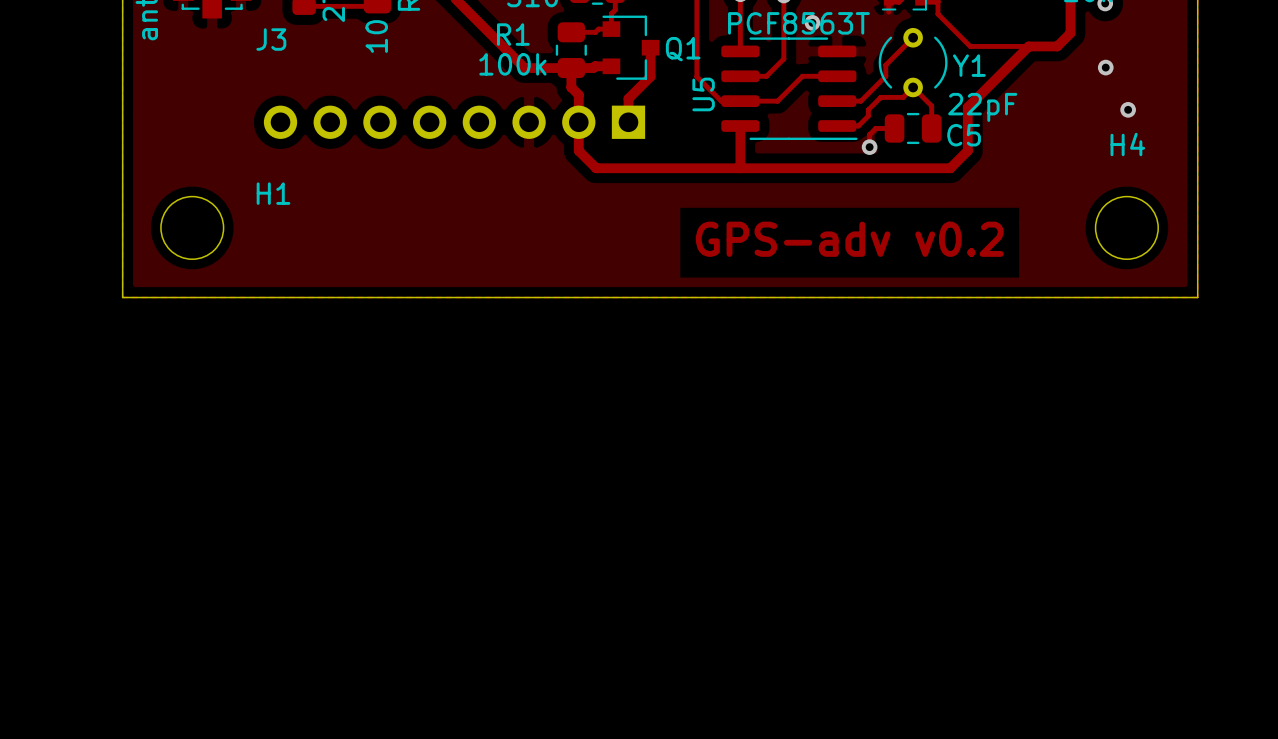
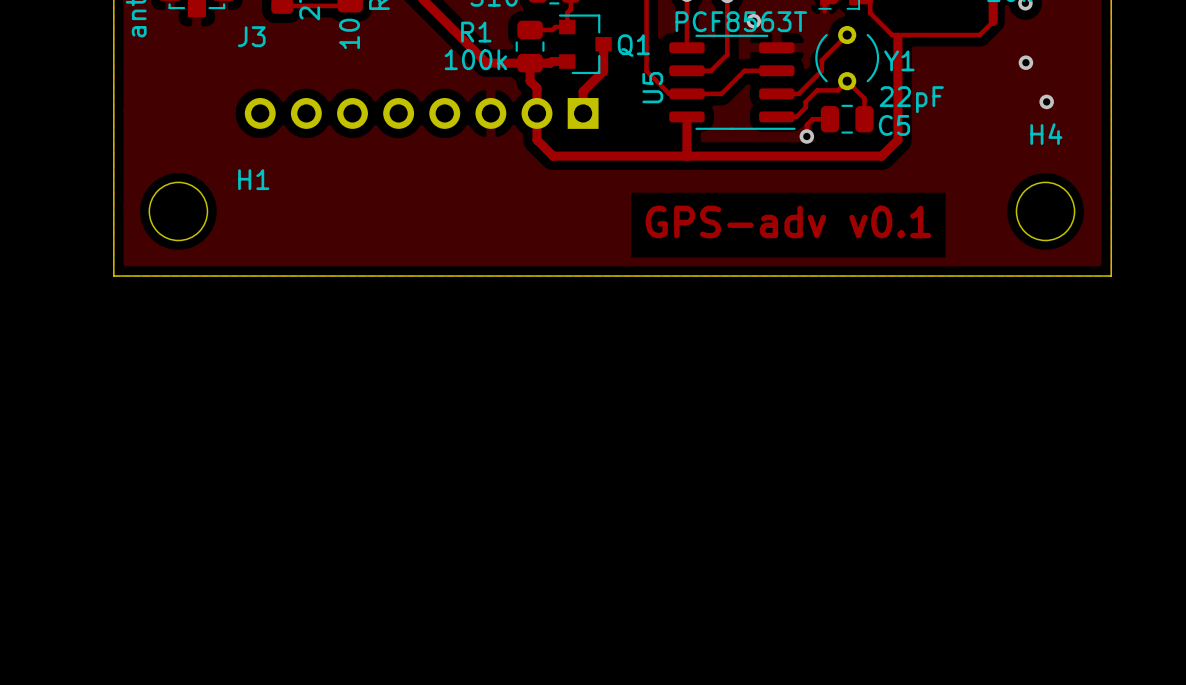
track: (1070, 23) (1070, 33) (1057, 46) (1028, 46) -> none
track: (961, 37) (970, 46) (1028, 46) -> (892, 35) (979, 35) (993, 21)
track: (1028, 46) (967, 107) -> (897, 35) (897, 99)
text: GPS-adv v0.2 (849, 239) -> GPS-adv v0.1 (788, 221)

